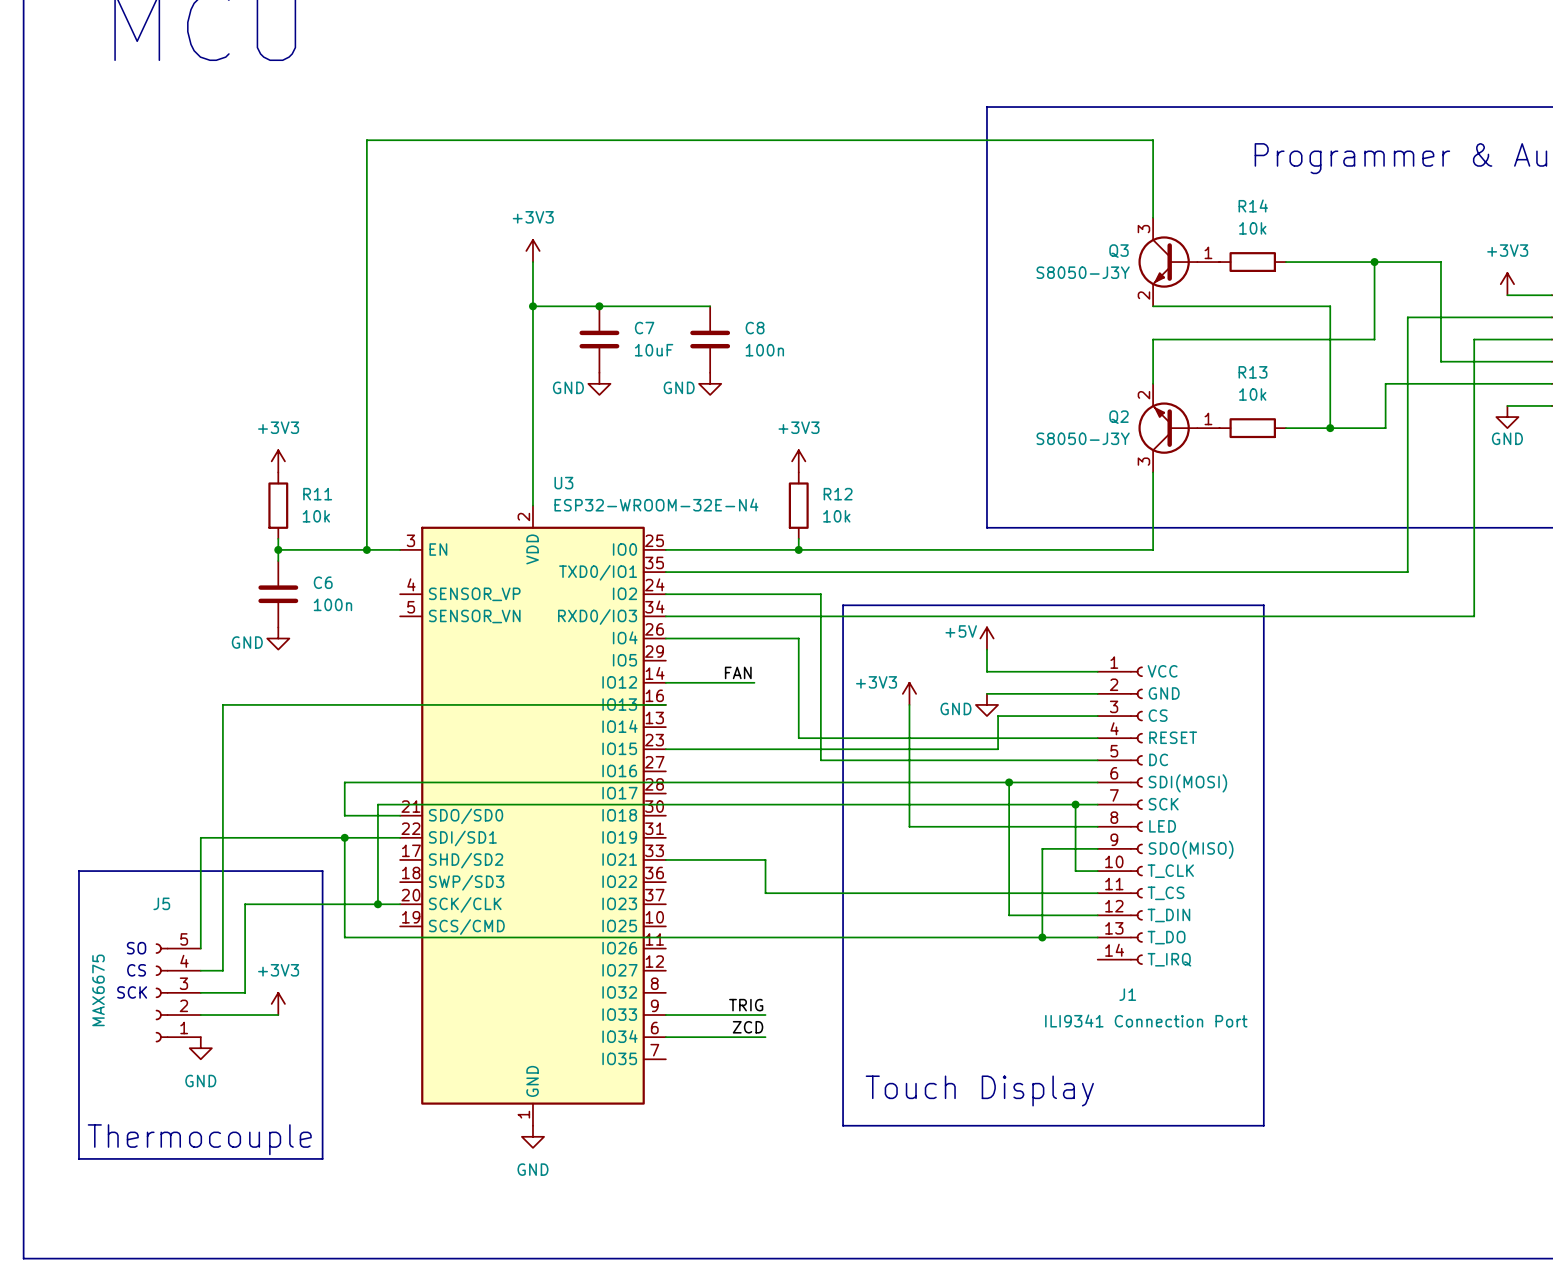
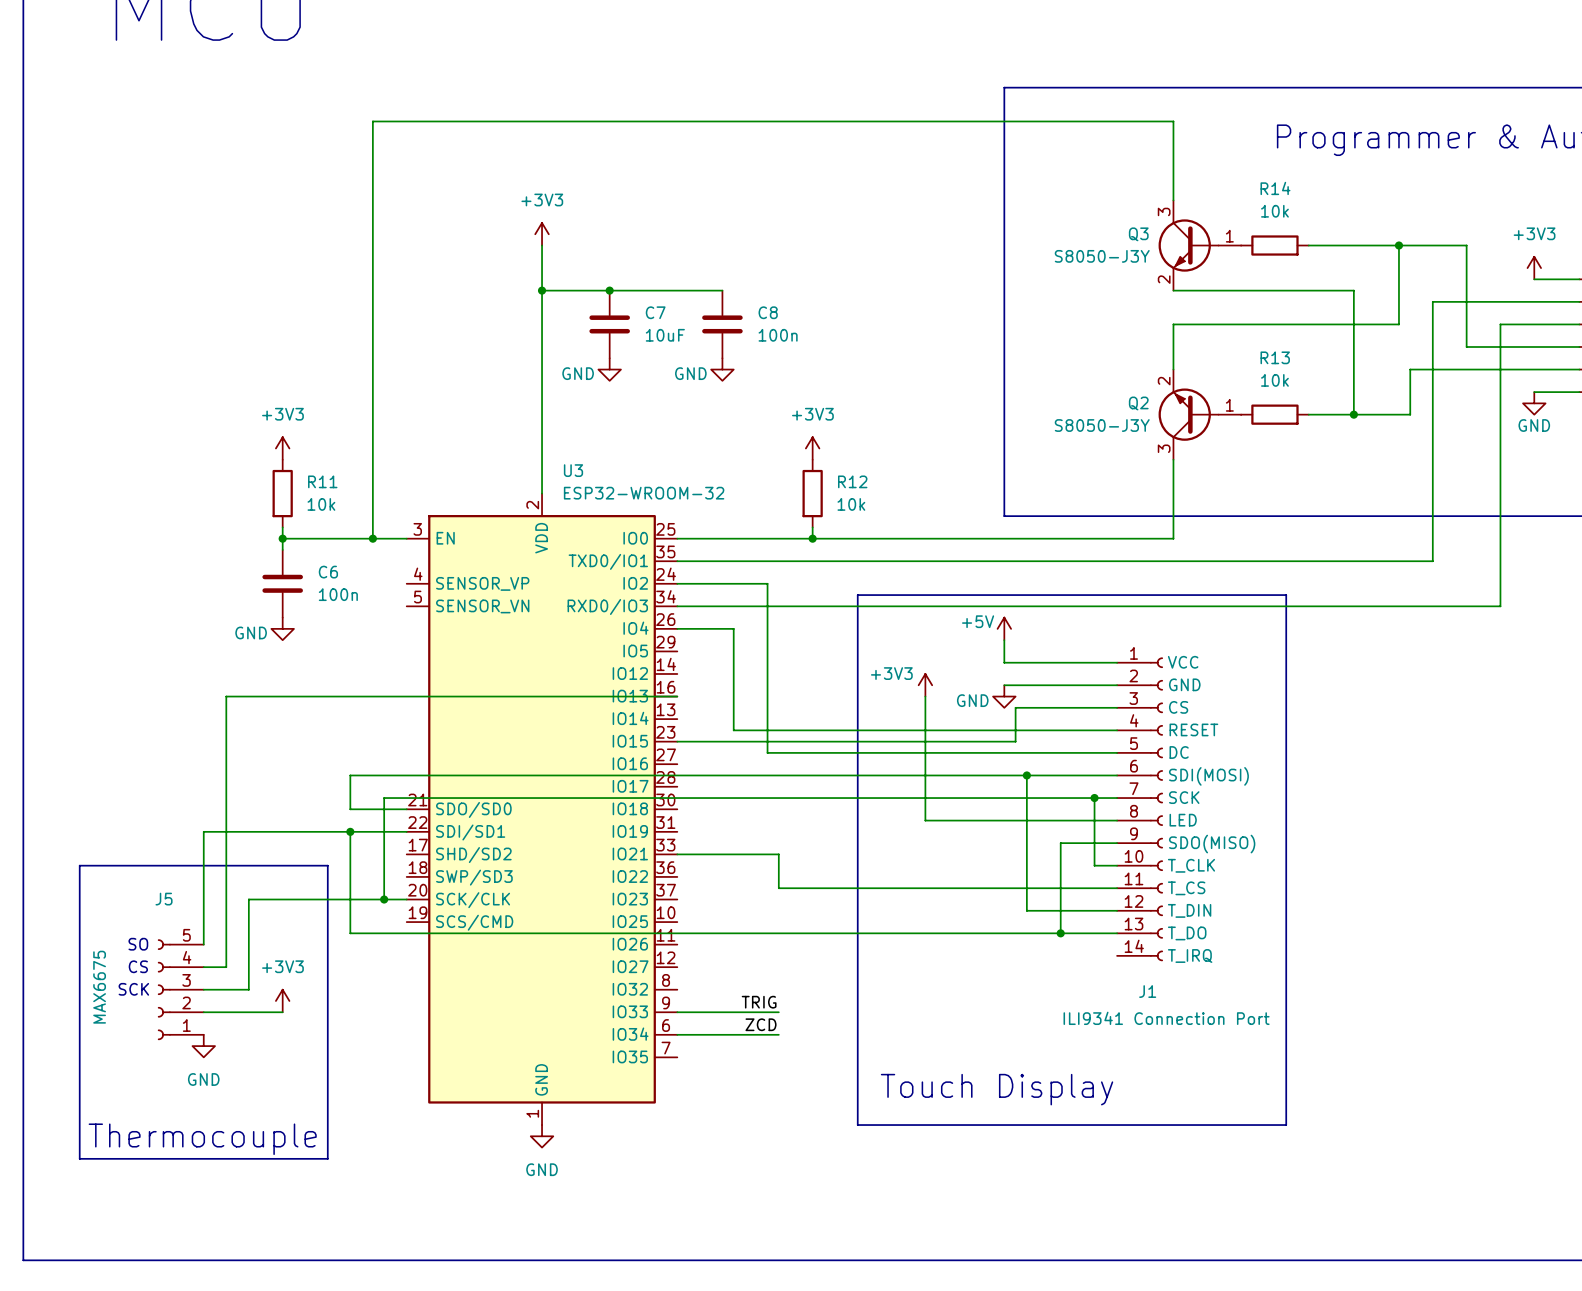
U3 value: ESP32-WROOM-32E-N4 (656, 504) -> ESP32-WROOM-32 (644, 493)
wire: (754, 594) (820, 594) (820, 760) -> (767, 583) (767, 752) (835, 752)
wire: (721, 638) (798, 638) (798, 738) -> (733, 628) (733, 730) (812, 730)
label: FAN (738, 672) -> none
wire: (665, 682) (754, 682) -> none

